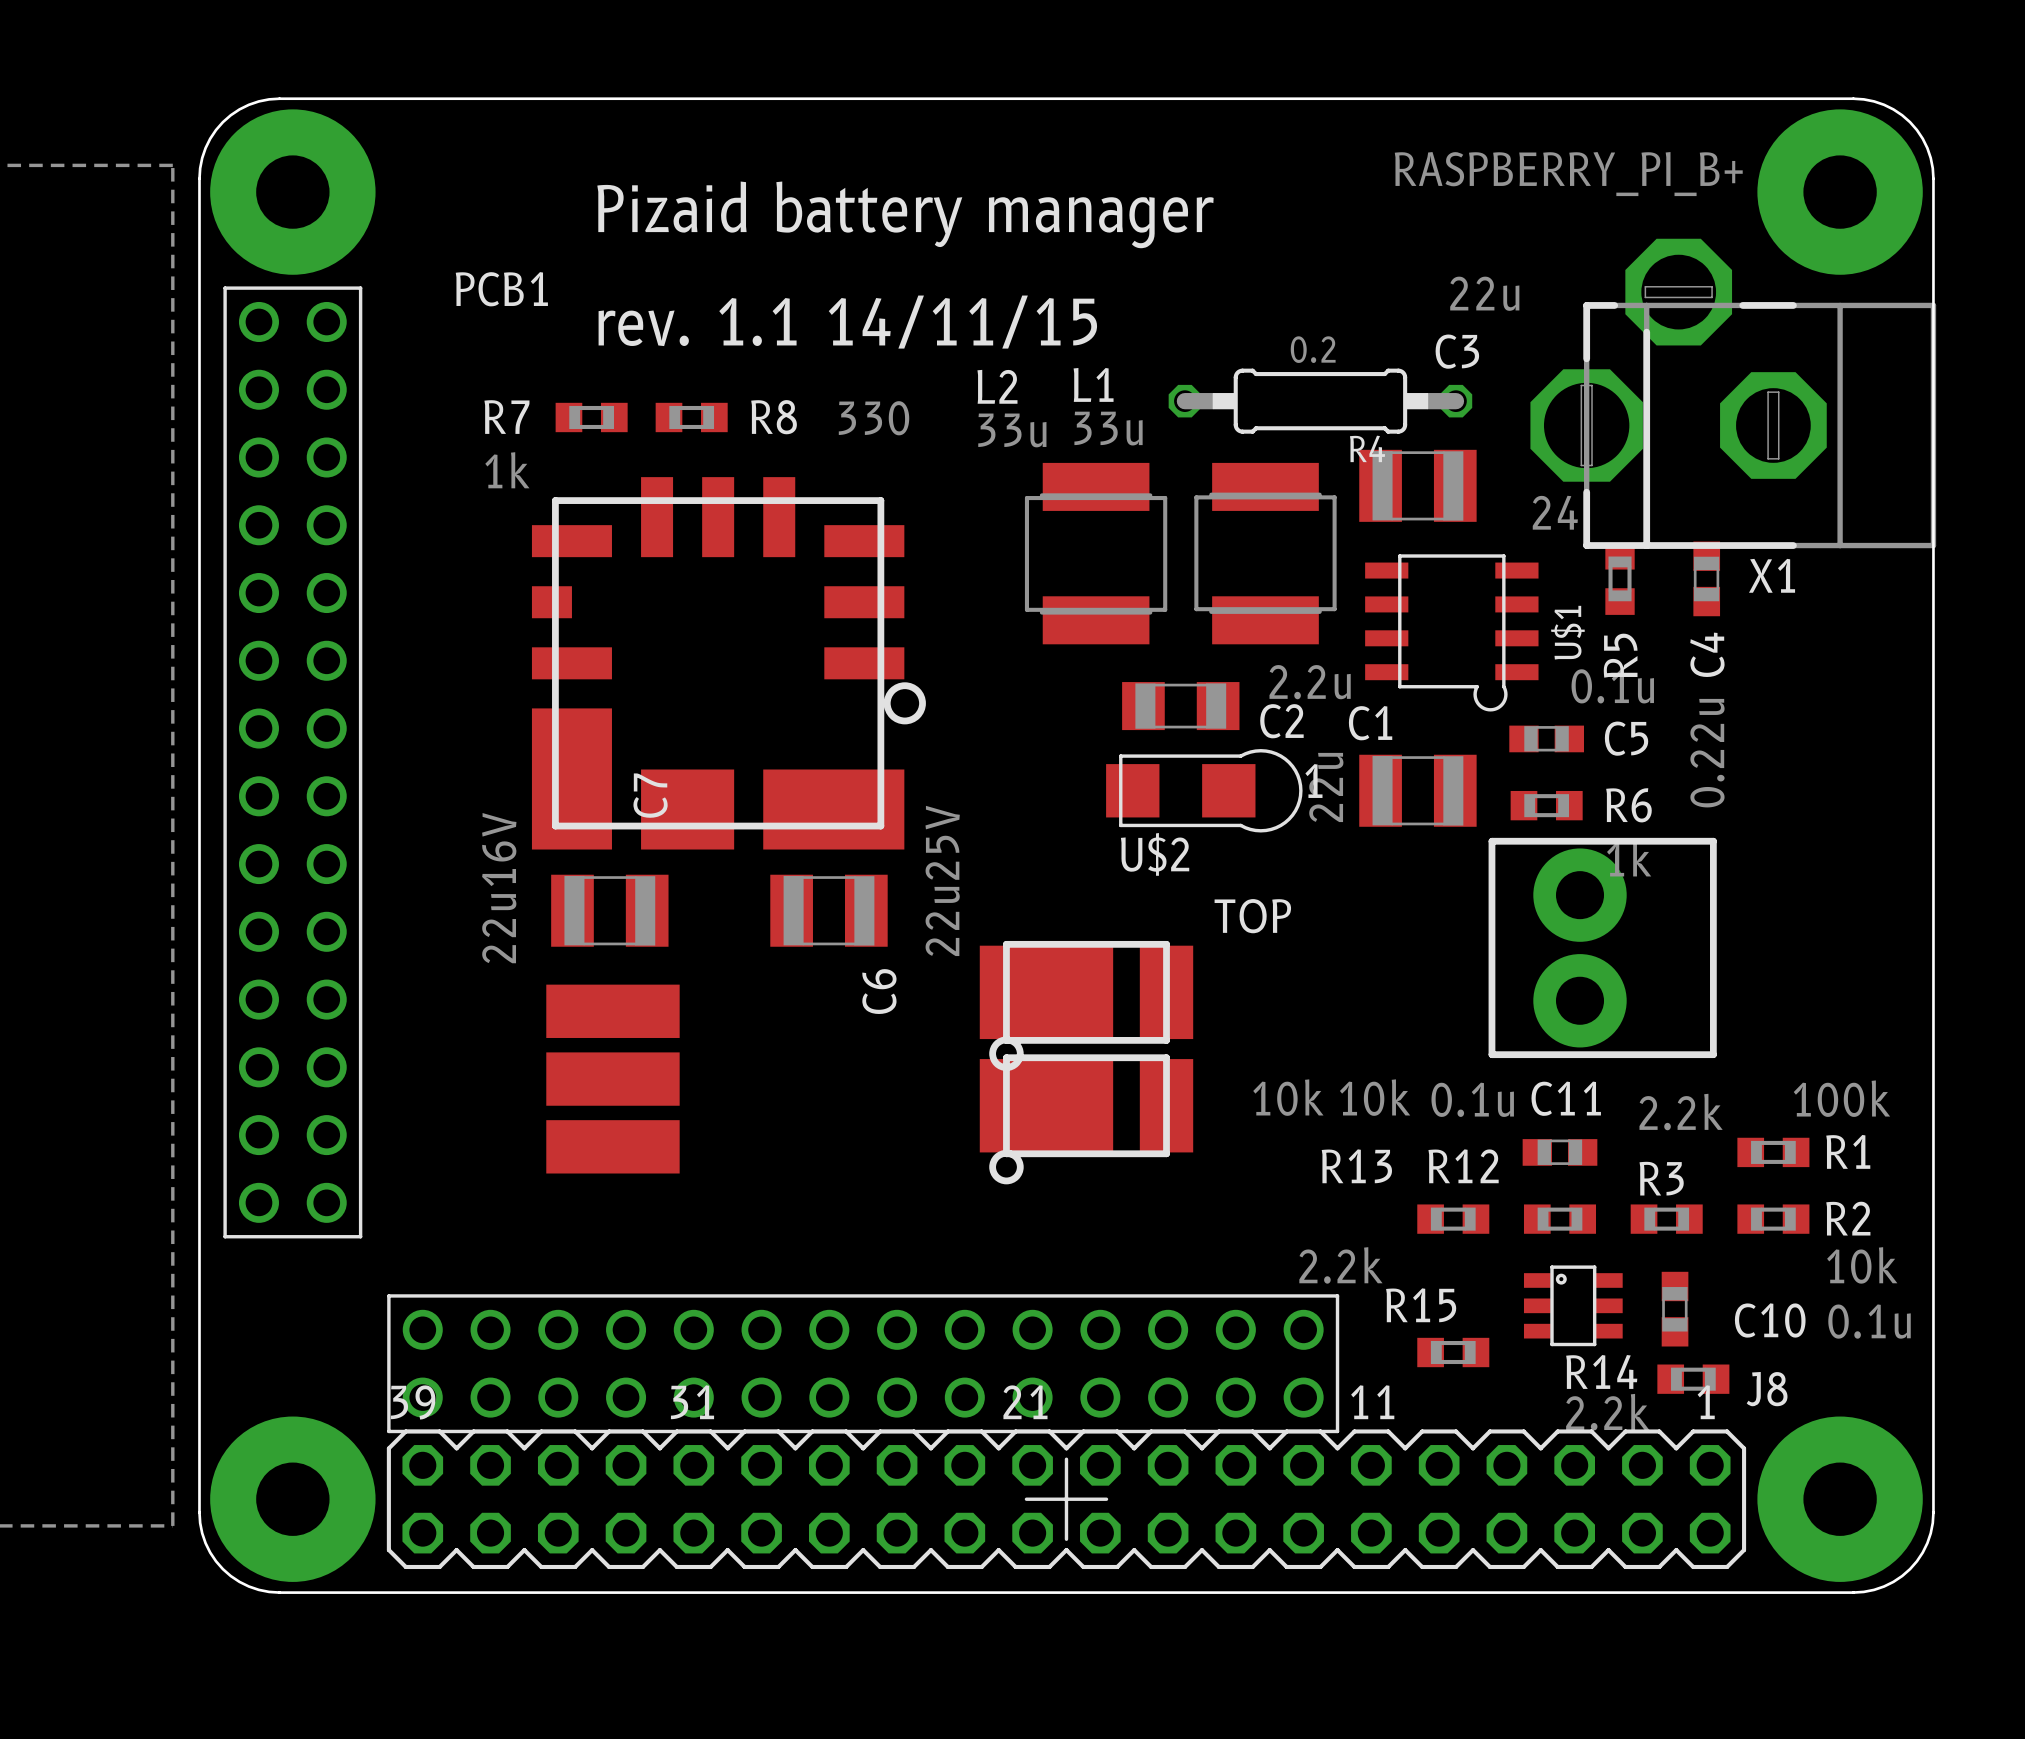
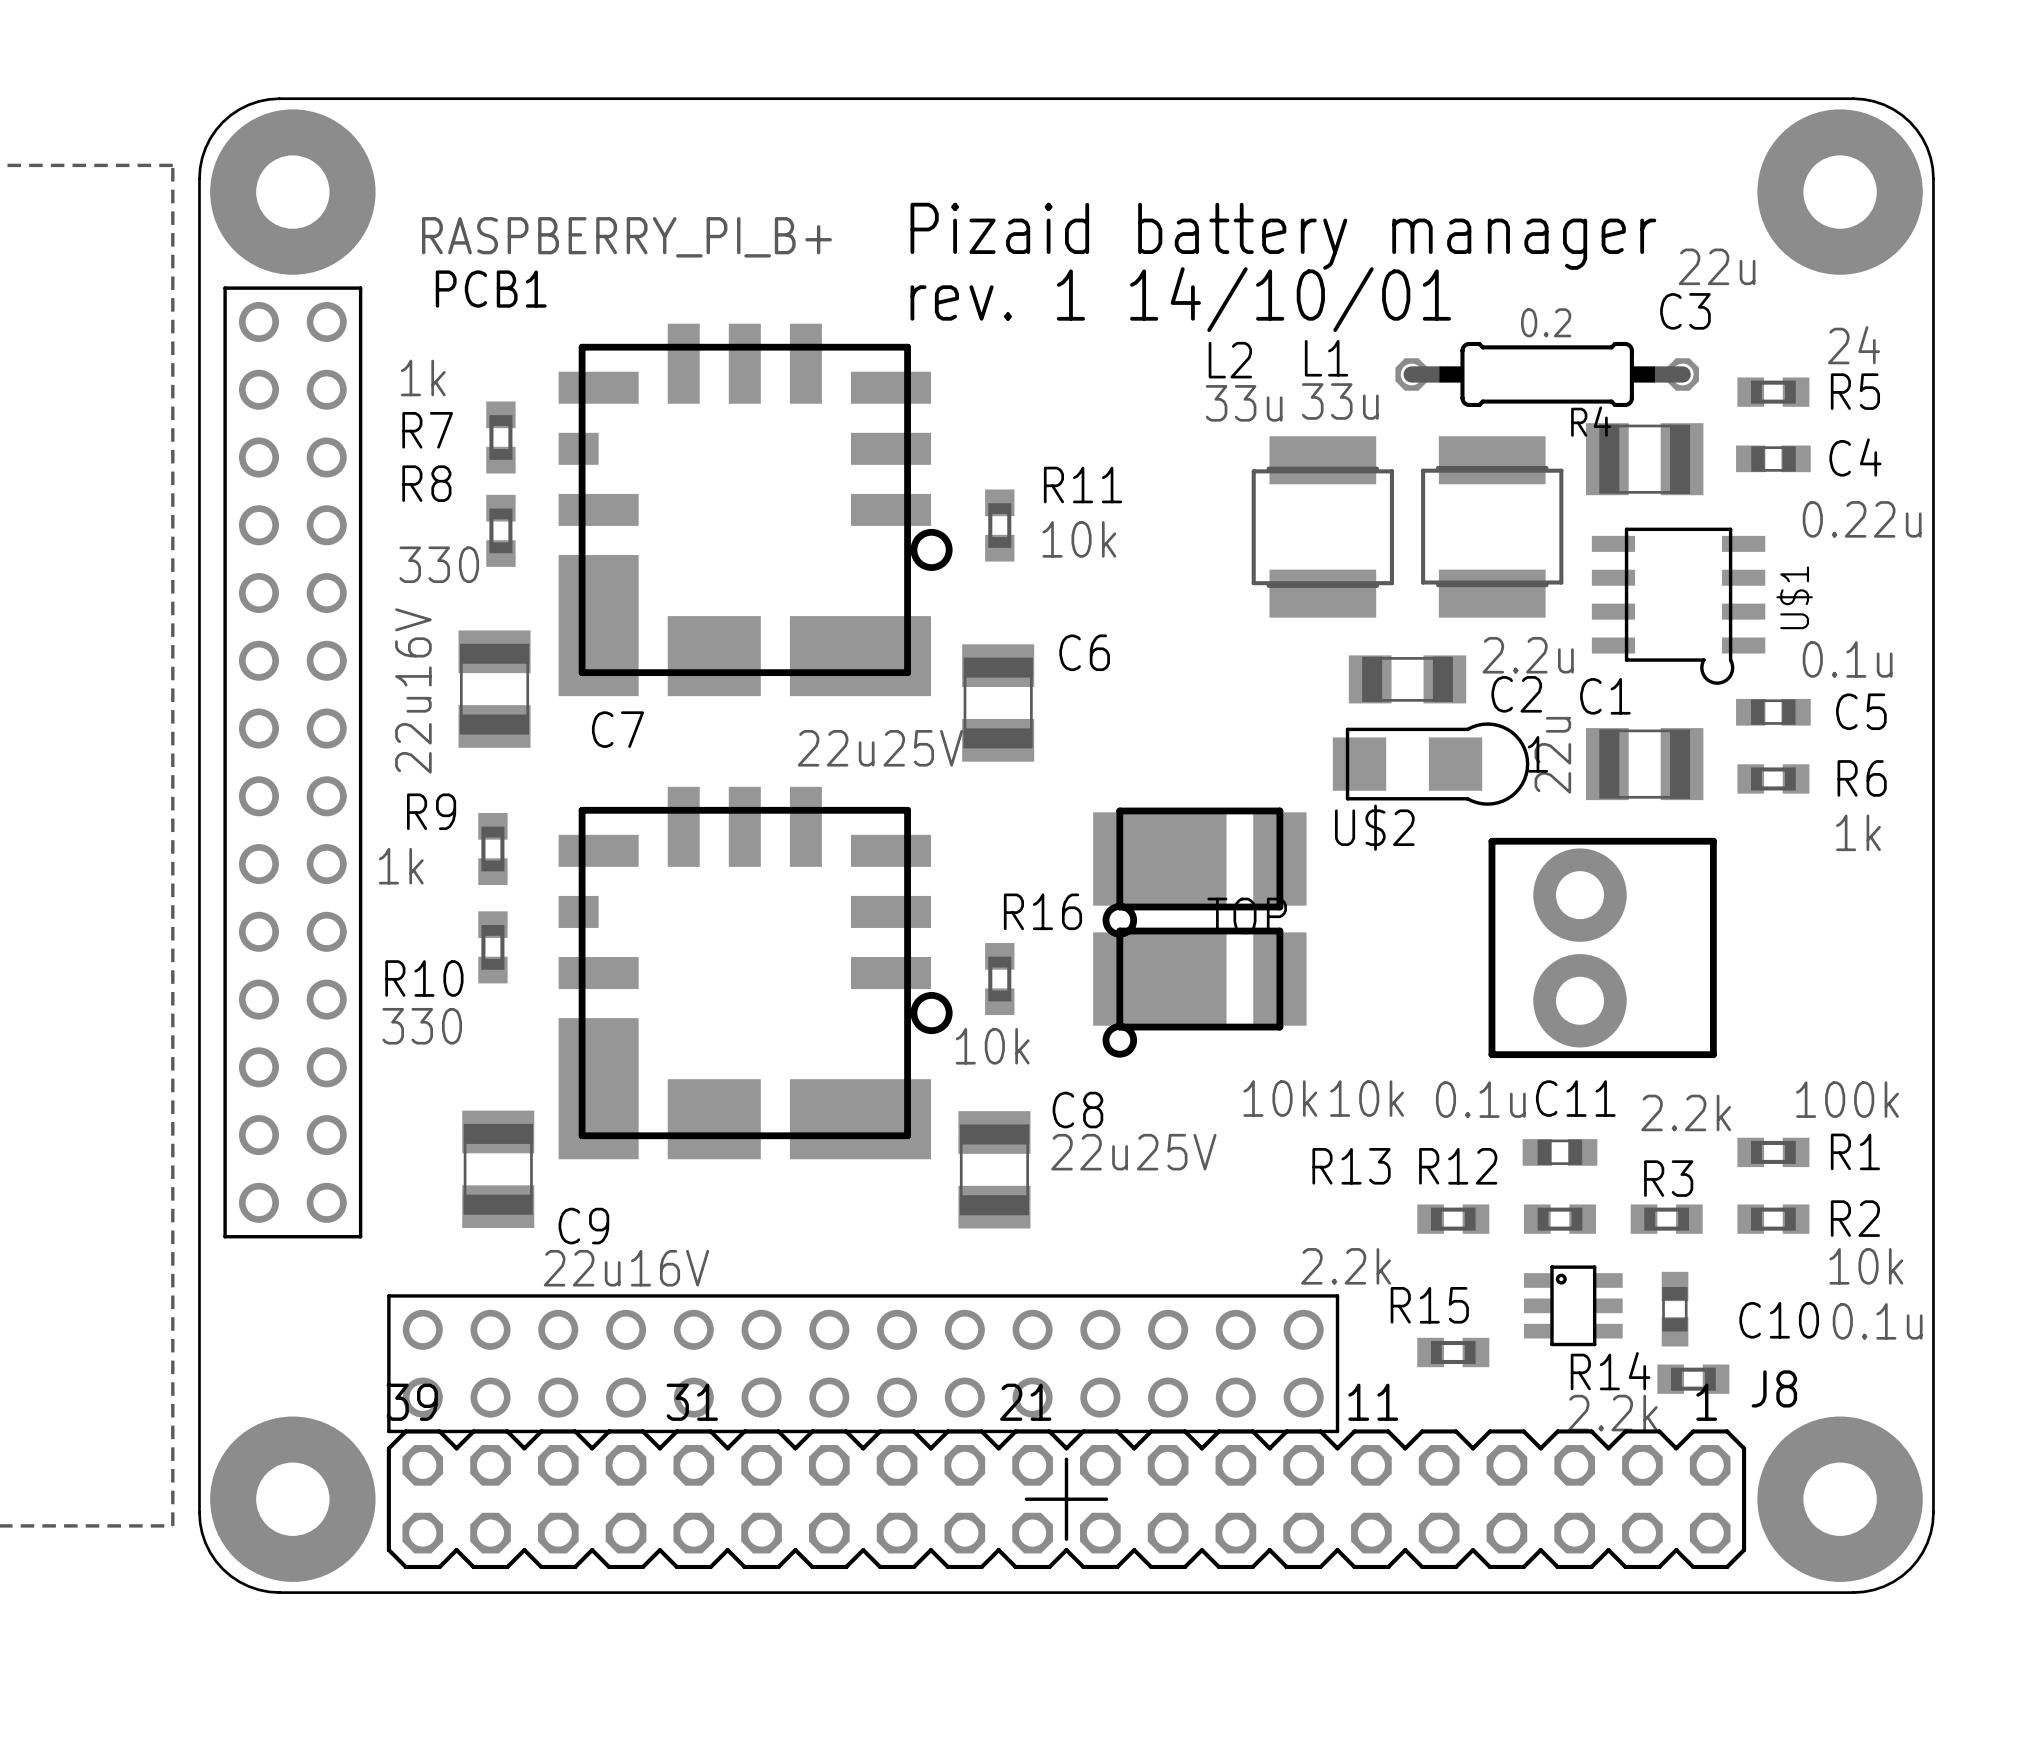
PCB1 value position: RASPBERRY_PI_B+ (1568, 174) -> RASPBERRY_PI_B+ (626, 237)
text position: Pizaid battery manager (905, 214) -> Pizaid battery manager (1283, 236)
text: rev. 1.1 14/11/15 (847, 322) -> rev. 1 14/10/01 (1180, 299)
C3 name position: C3 (1457, 351) -> C3 (1685, 311)
X1: (1733, 393) -> none
R4 position: (1320, 401) -> (1547, 374)
R7 rotation: 0° (591, 417) -> 90° clockwise (500, 437)
R7 position: (591, 417) -> (500, 437)
R8 rotation: 0° (691, 417) -> 90° clockwise (500, 530)
R8 position: (691, 417) -> (500, 530)
R8 name position: R8 (774, 417) -> R8 (426, 483)
R8 value position: 330 (874, 418) -> 330 (439, 564)
C3 position: (1417, 485) -> (1644, 459)
part: none -> (755, 509)
R11: none -> 10k (999, 525)
L2 position: (1096, 553) -> (1322, 526)
L1 position: (1265, 553) -> (1492, 526)
R5 rotation: 0° (1620, 578) -> 90° clockwise (1773, 392)
R5 position: (1620, 578) -> (1773, 392)
C4 rotation: 0° (1706, 578) -> 90° clockwise (1773, 458)
C4 position: (1706, 578) -> (1773, 458)
U$1 position: (1451, 632) -> (1678, 606)
C4 name position: C4 (1707, 654) -> C4 (1855, 457)
R5 name position: R5 (1620, 655) -> R5 (1855, 391)
part: (728, 663) -> none
C2 position: (1180, 706) -> (1407, 679)
C5 position: (1546, 738) -> (1773, 712)
C4 value position: 0.22u (1707, 753) -> 0.22u (1862, 519)
U$2 position: (1204, 790) -> (1431, 764)
C1 position: (1417, 790) -> (1644, 764)
R6 position: (1546, 805) -> (1773, 778)
R9: none -> 1k (492, 848)
part: none -> (1199, 872)
C6 value position: 22u25V (942, 880) -> 22u25V (880, 748)
C7 value position: 22u16V (499, 888) -> 22u16V (413, 690)
C7 rotation: 0° (609, 910) -> 90° clockwise (494, 689)
C7 position: (609, 910) -> (494, 689)
C6 rotation: 0° (828, 910) -> 90° clockwise (998, 703)
C6 position: (828, 910) -> (998, 703)
R10: none -> 330 (492, 947)
part: none -> (755, 973)
R16: none -> 10k (999, 979)
C6 name position: C6 (879, 991) -> C6 (1084, 652)
part: none -> (1199, 992)
part: (1086, 1005) -> none
part: (612, 1079) -> none
part: (1086, 1119) -> none
C9: none -> 22u16V (498, 1169)
C8: none -> 22u25V (994, 1169)

